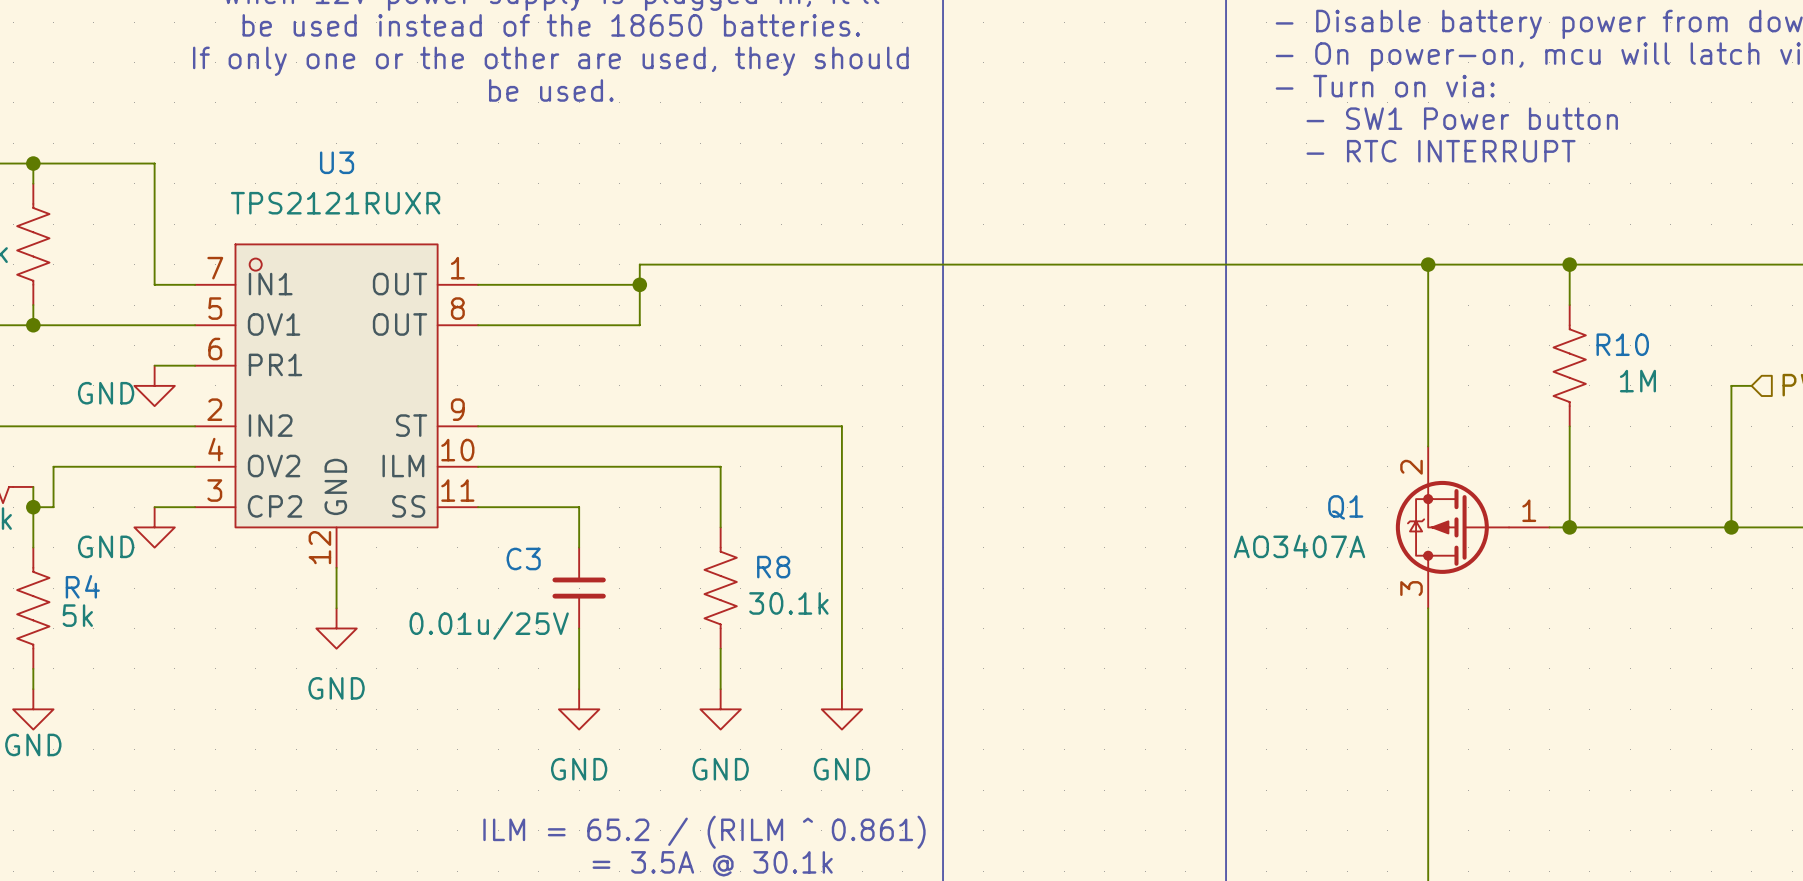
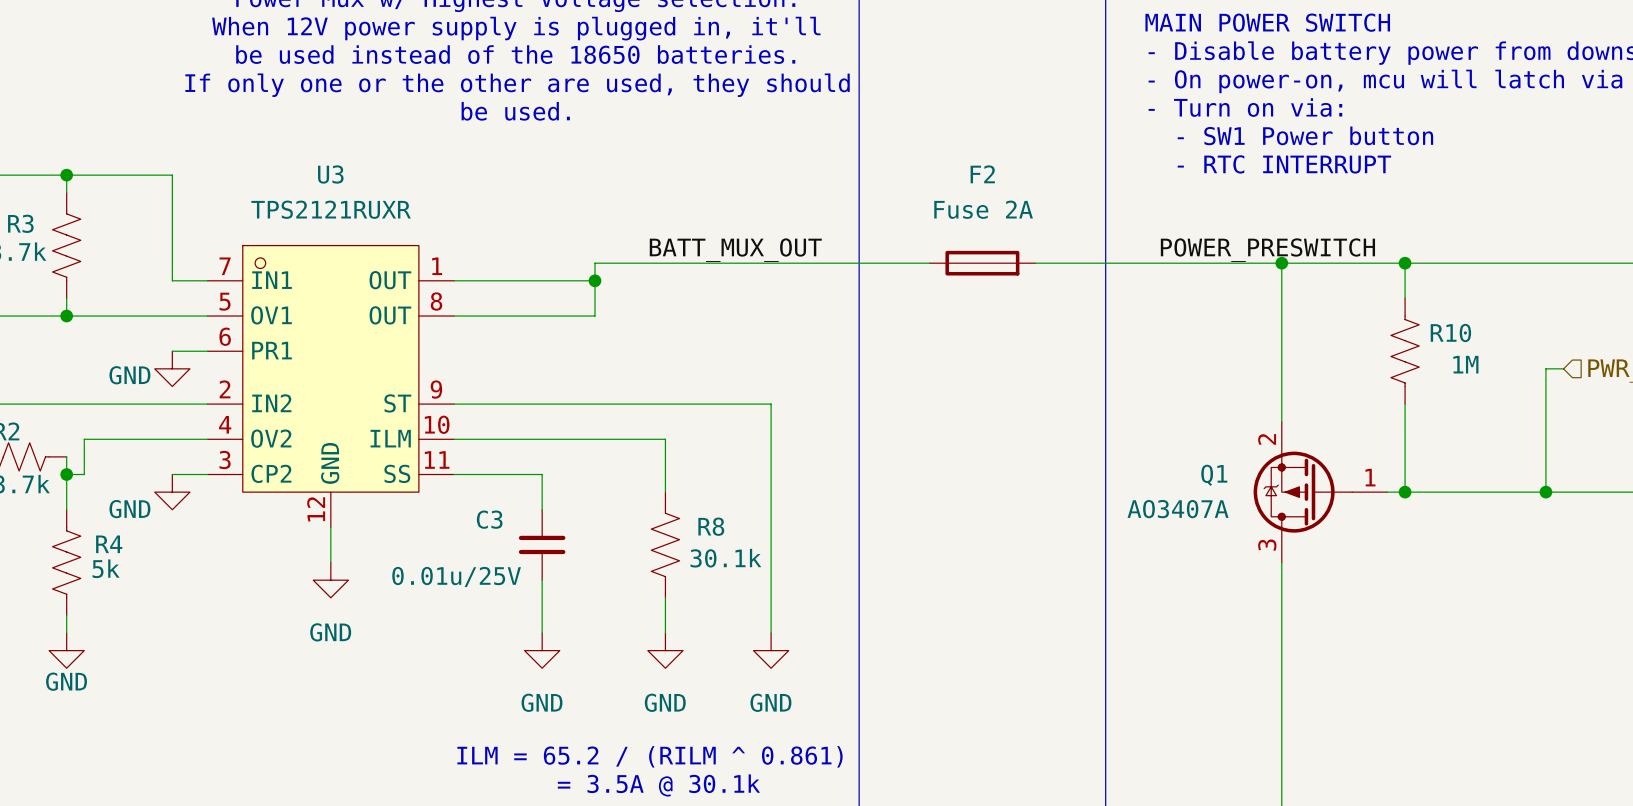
label: none -> BATT_MUX_OUT (735, 250)
label: none -> POWER_PRESWITCH (1267, 250)
F2: none -> Fuse 2A (982, 263)

